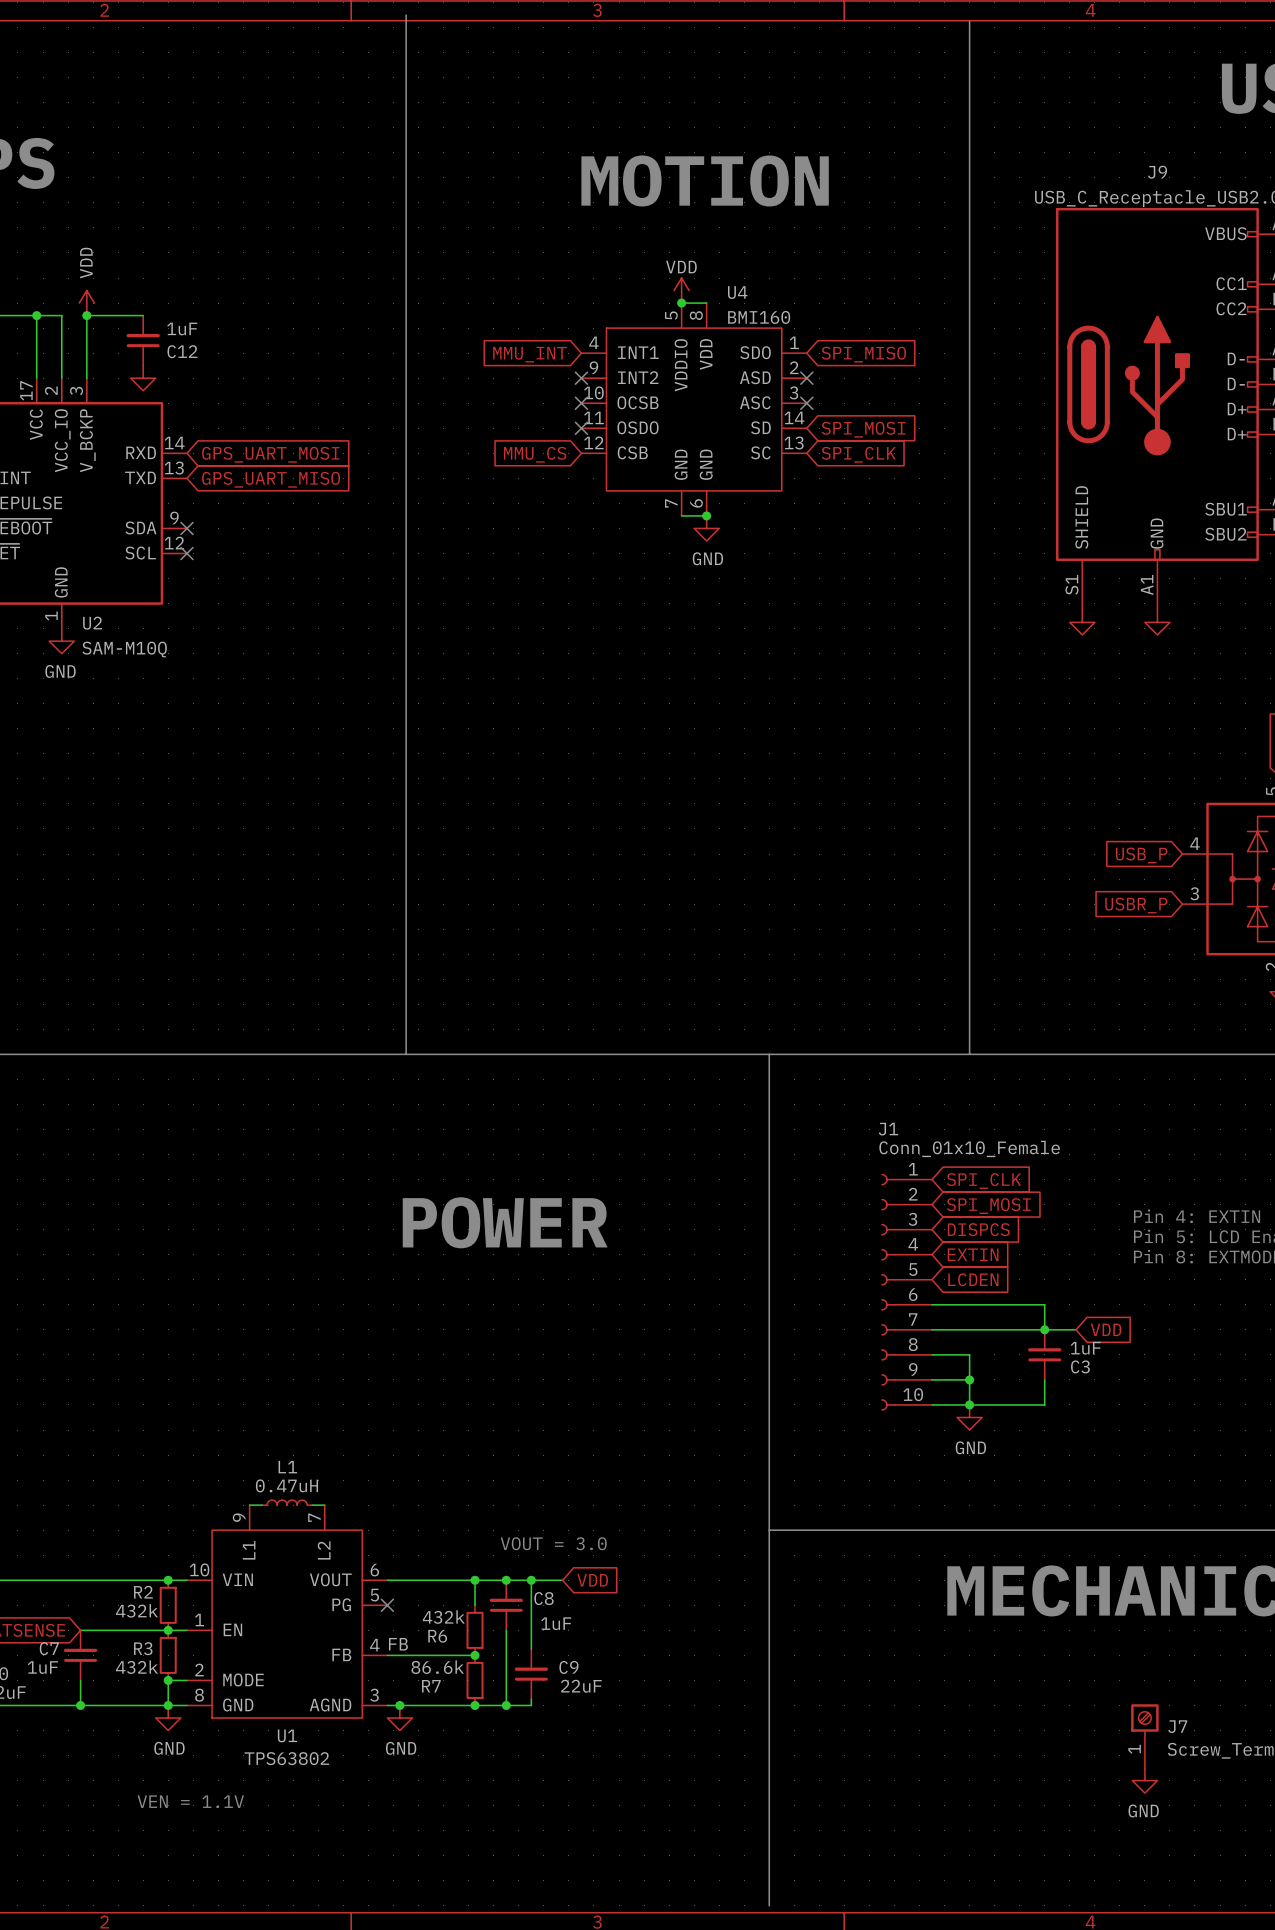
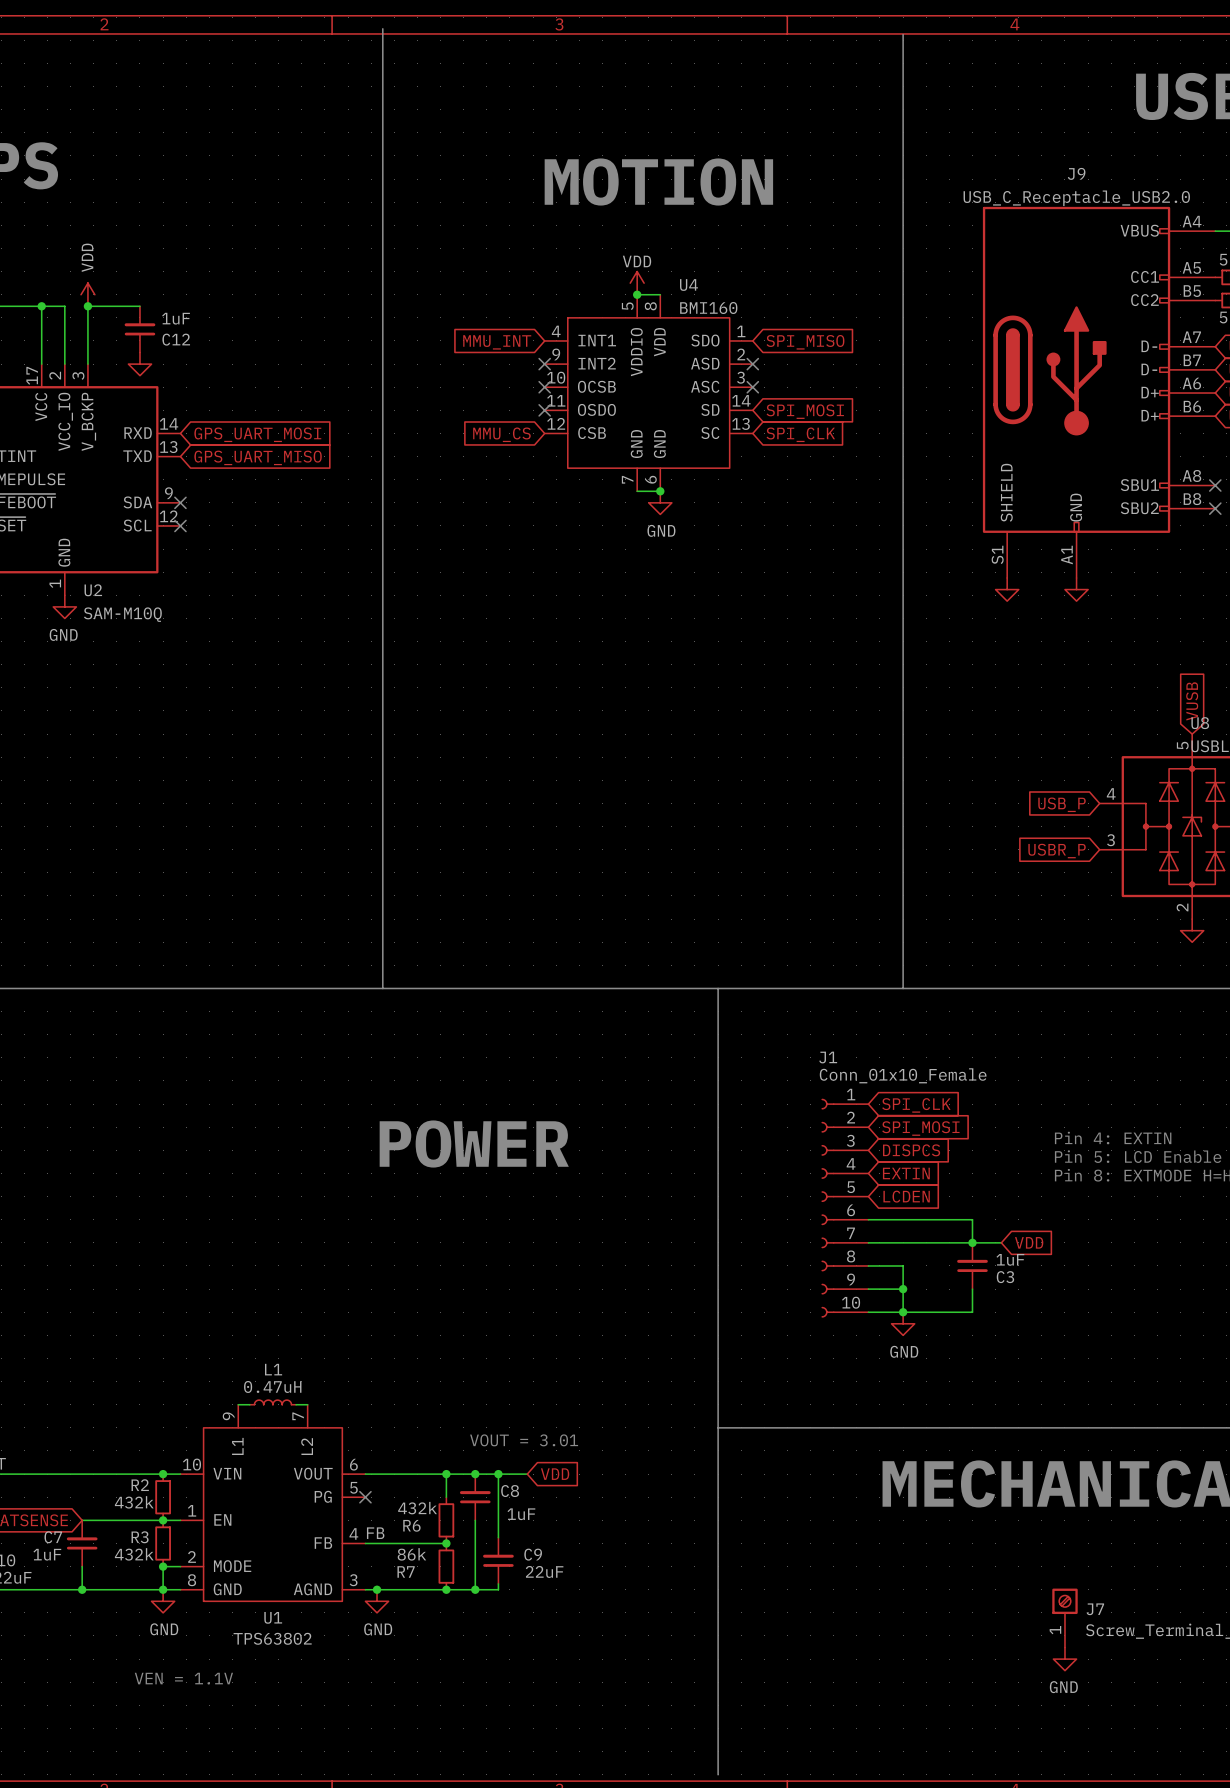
text: VOUT = 3.0 (553, 1543) -> VOUT = 3.01 (524, 1440)
R7 value: 86.6k (437, 1667) -> 86k (411, 1554)

